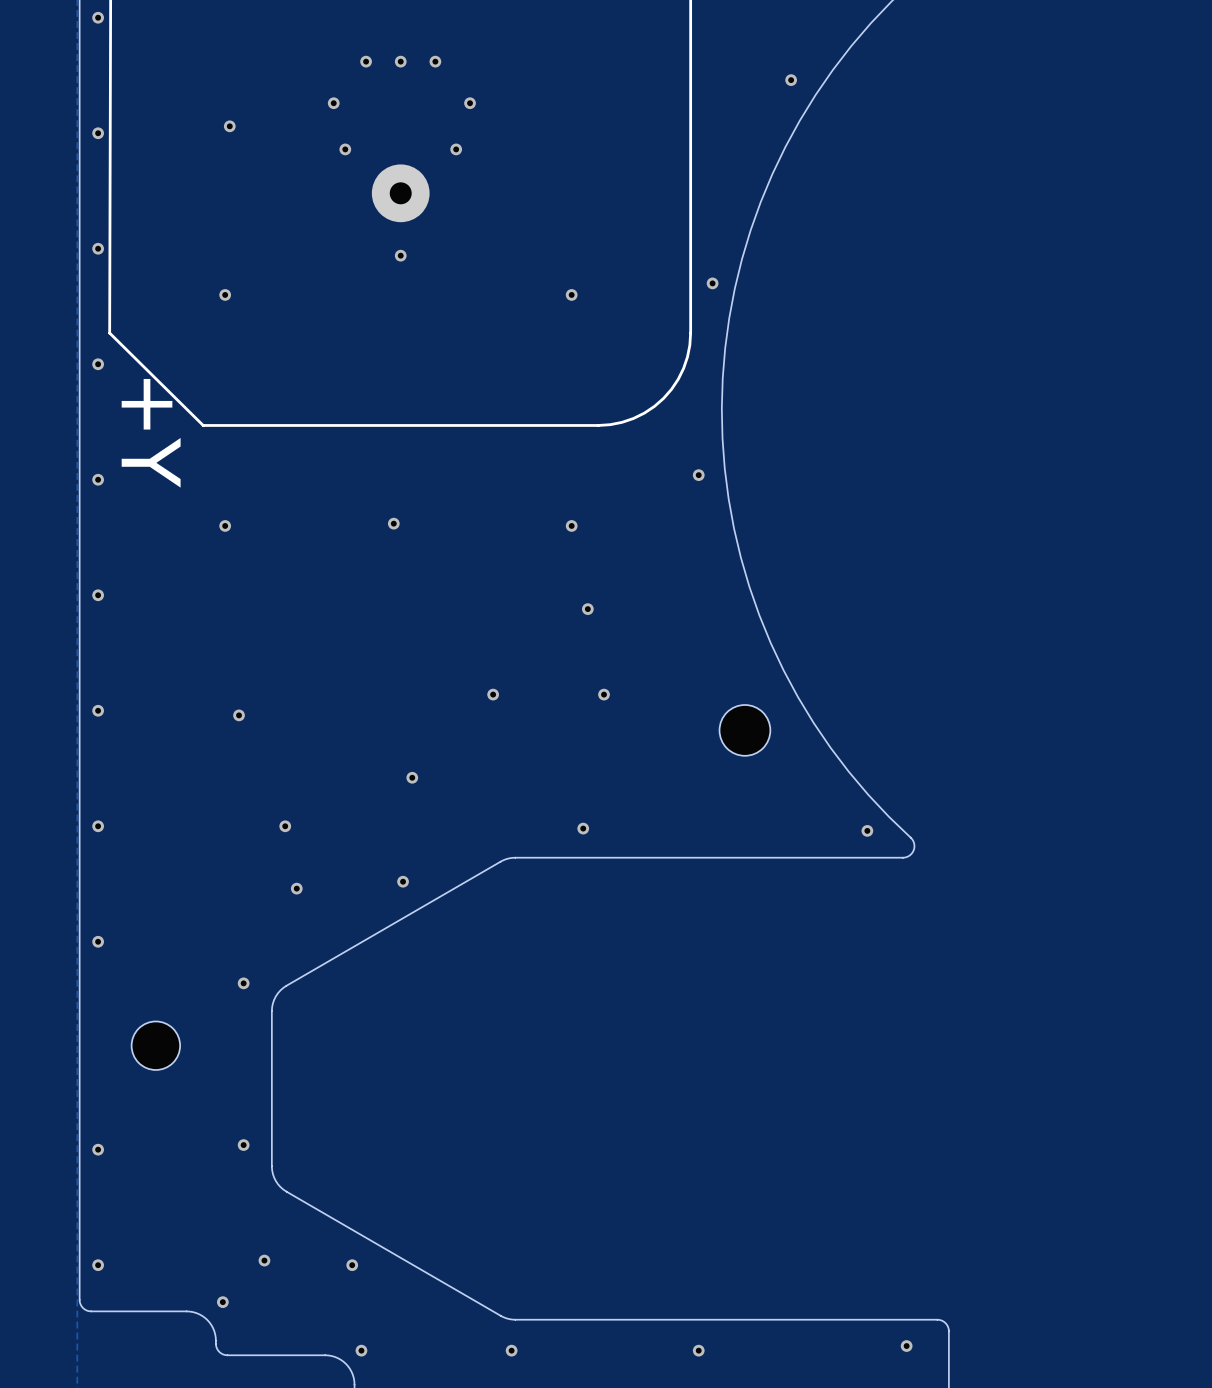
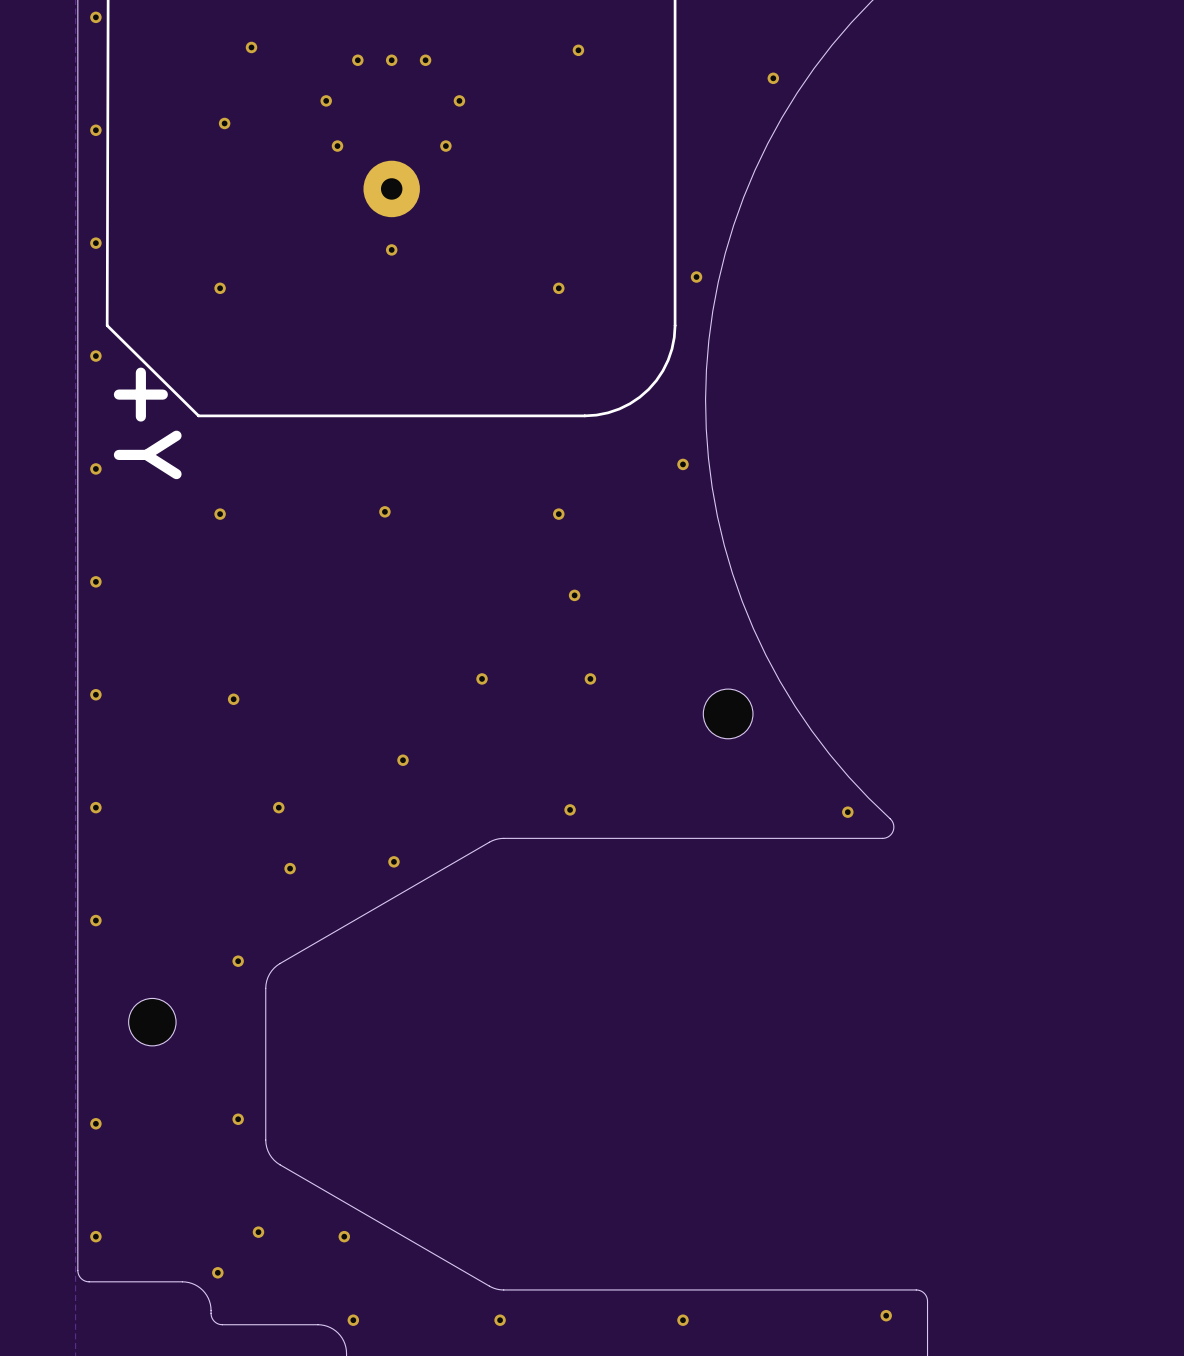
via: none -> (251, 47)
via: none -> (578, 50)

